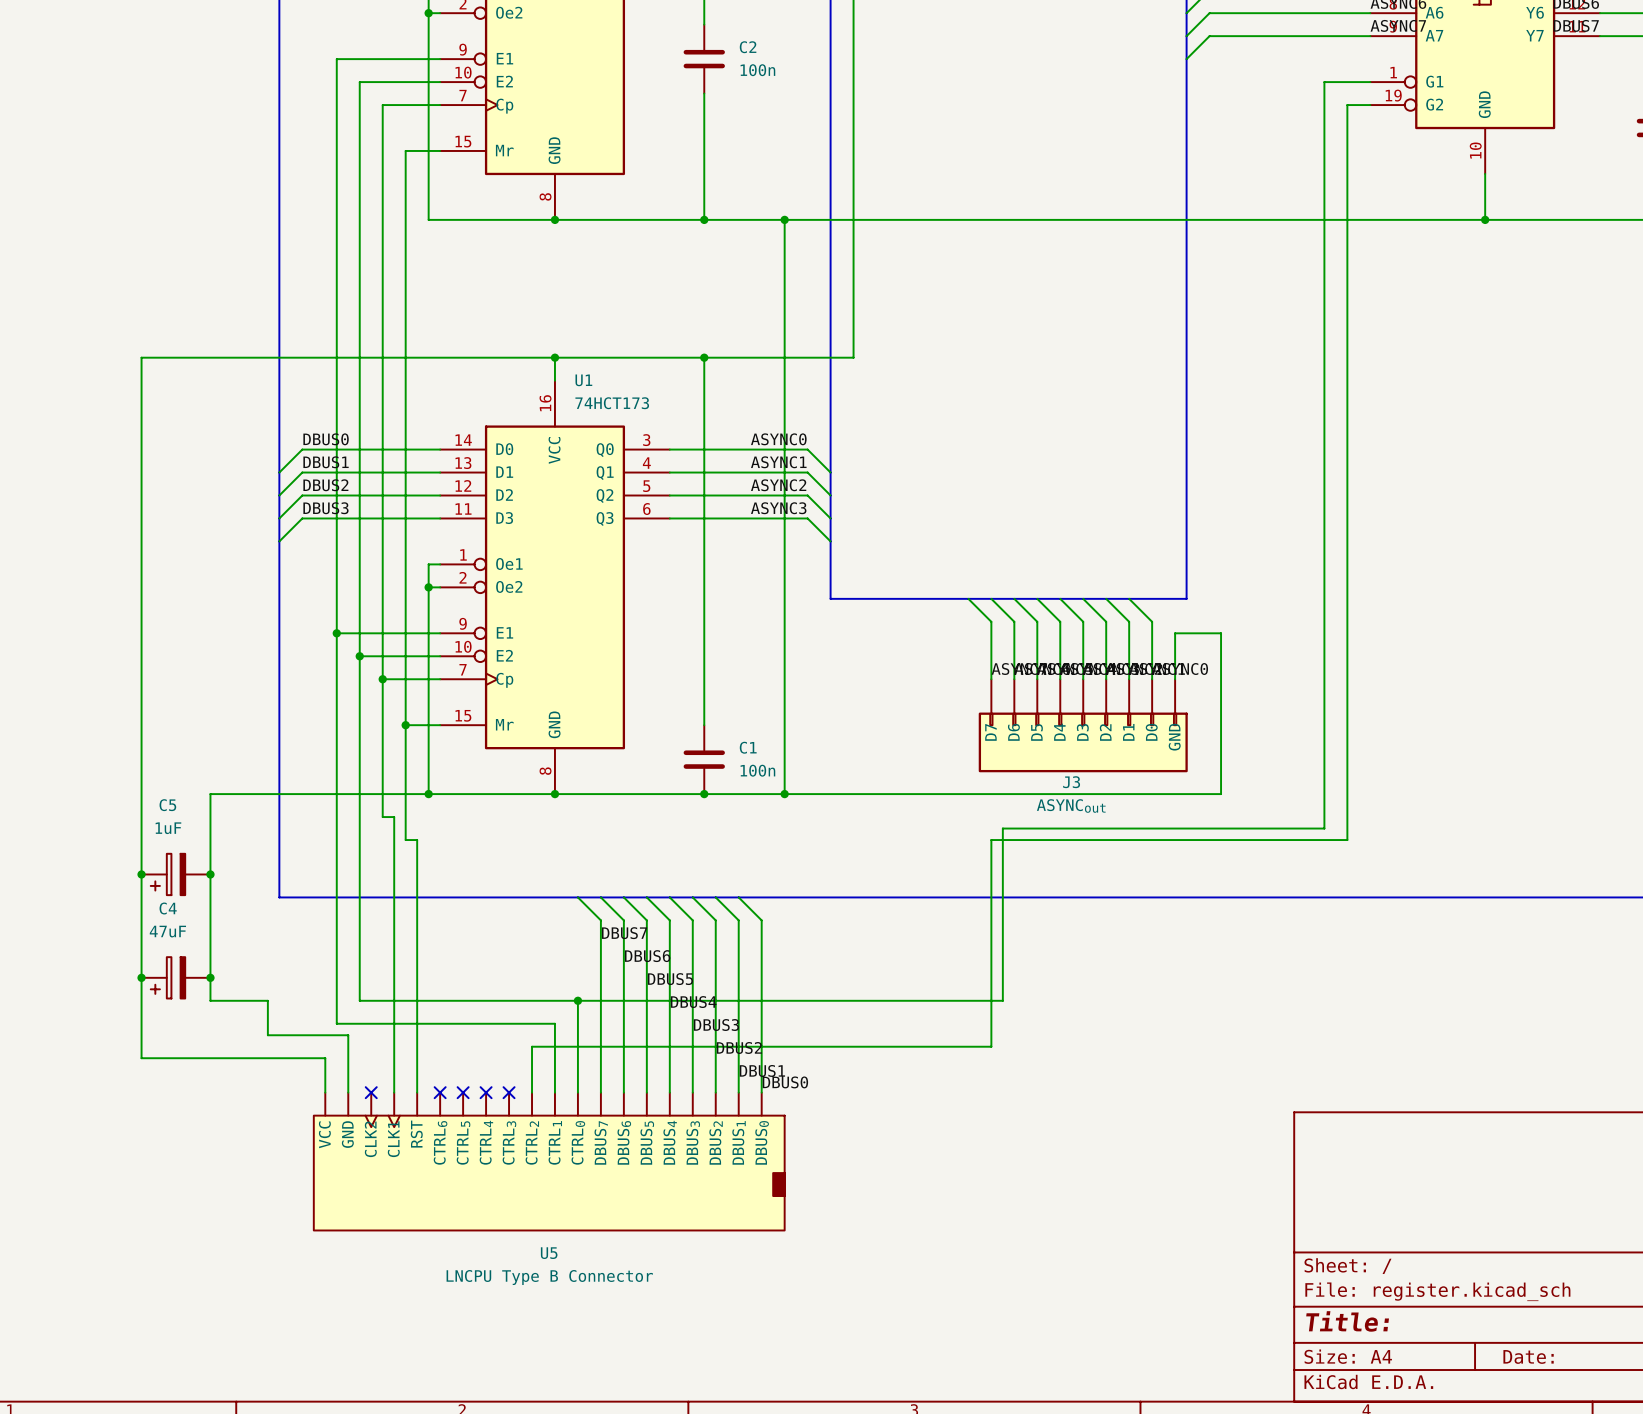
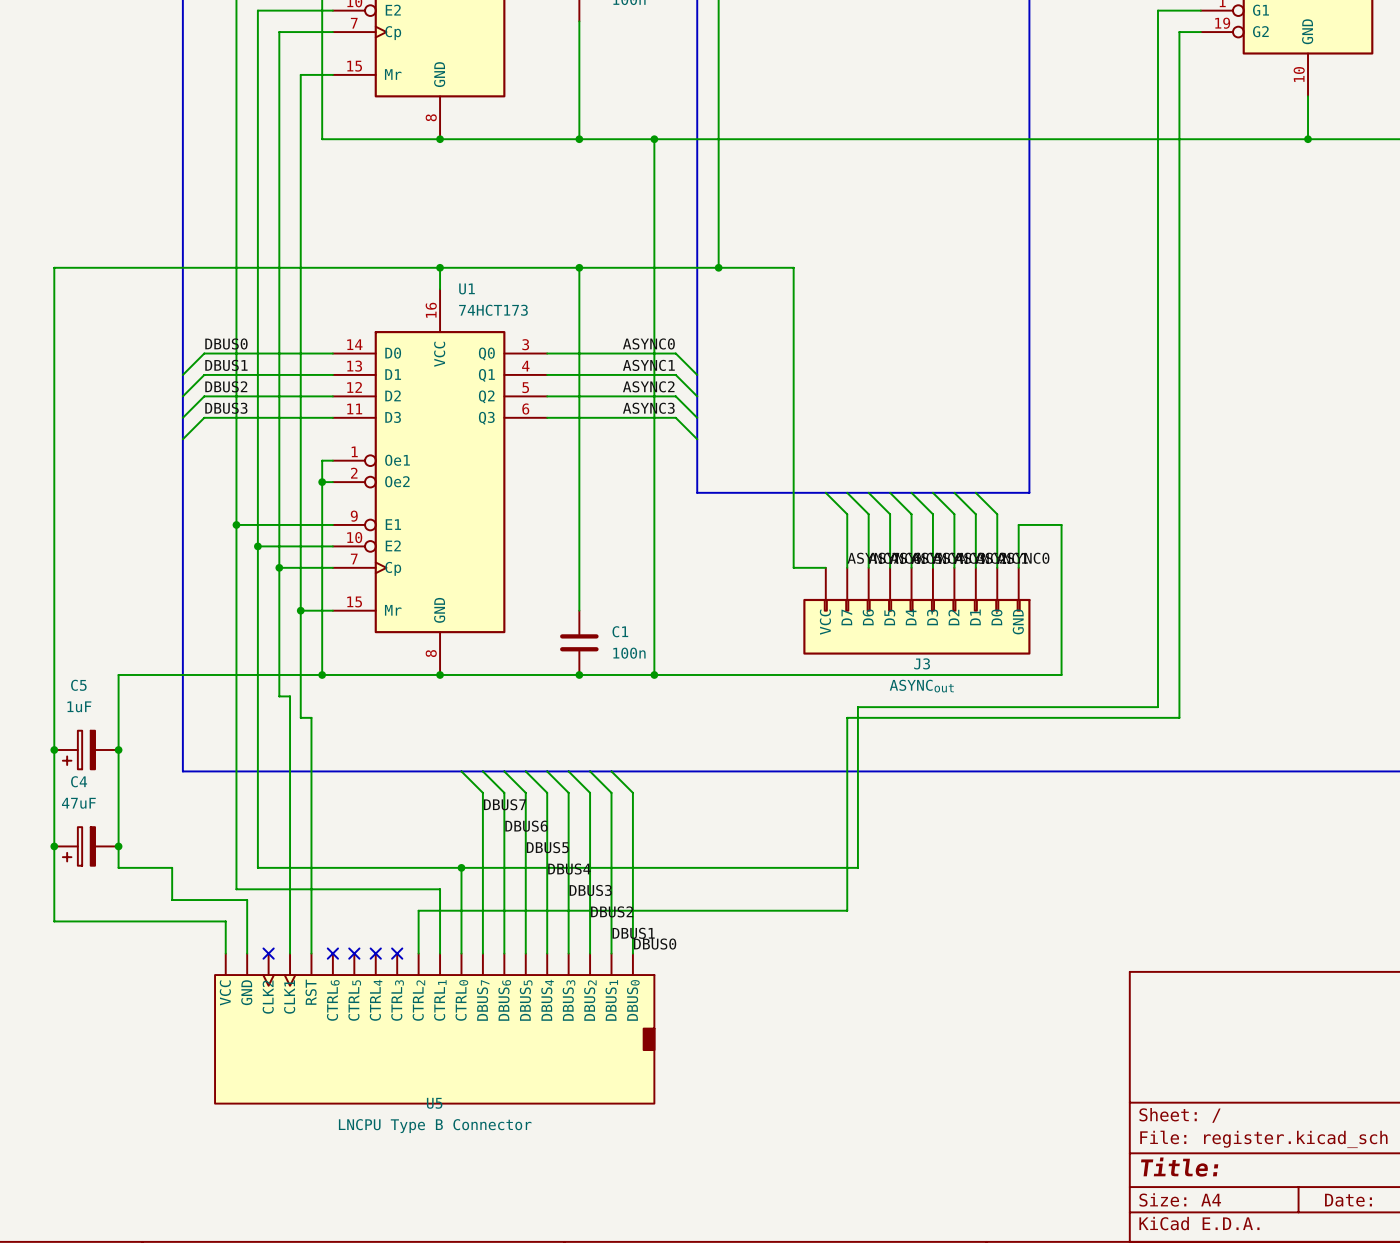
wire: none -> (718, 267) (793, 267) (793, 567) (825, 567)
junction: none -> (718, 267)
J3 symbol: [978, 679, 1188, 773] -> [803, 567, 1031, 655]
U5 symbol: [313, 1092, 785, 1231] -> [215, 953, 655, 1104]

